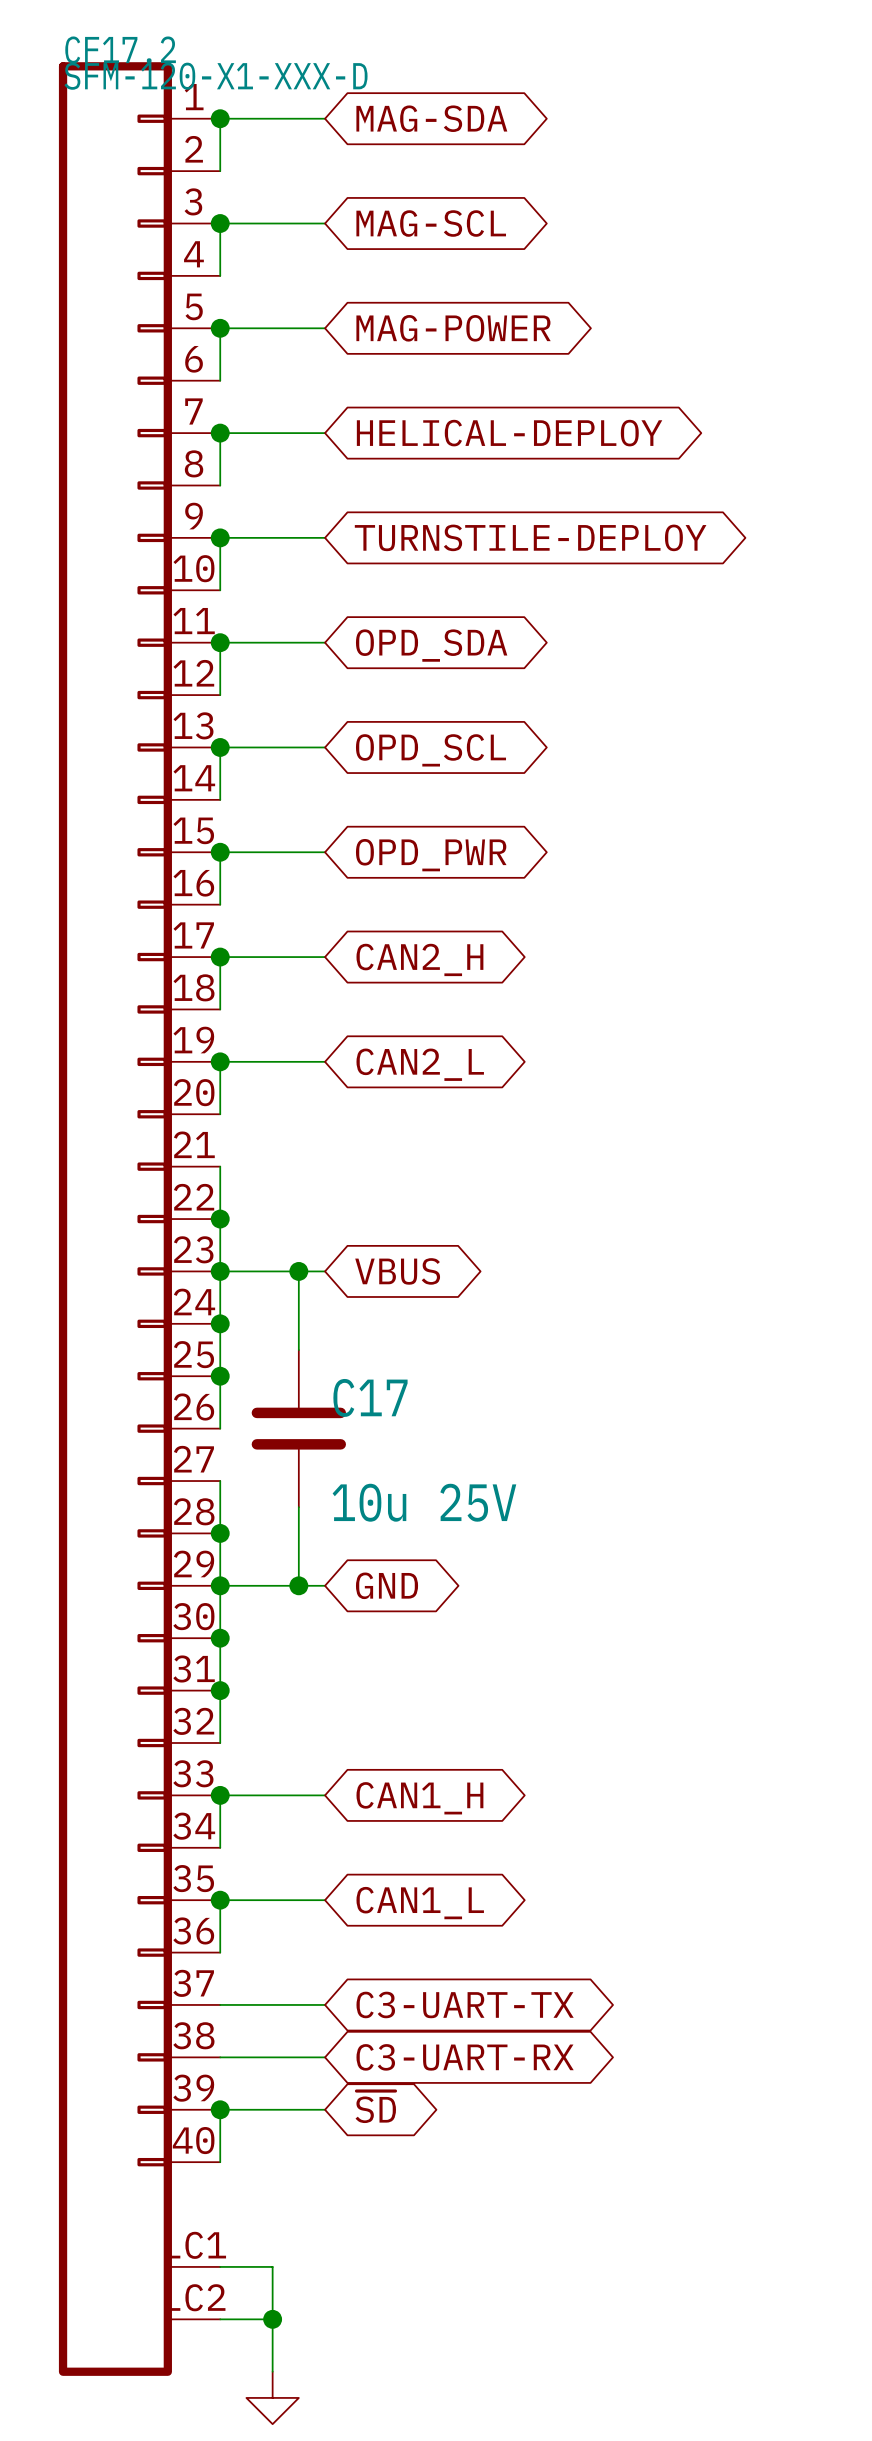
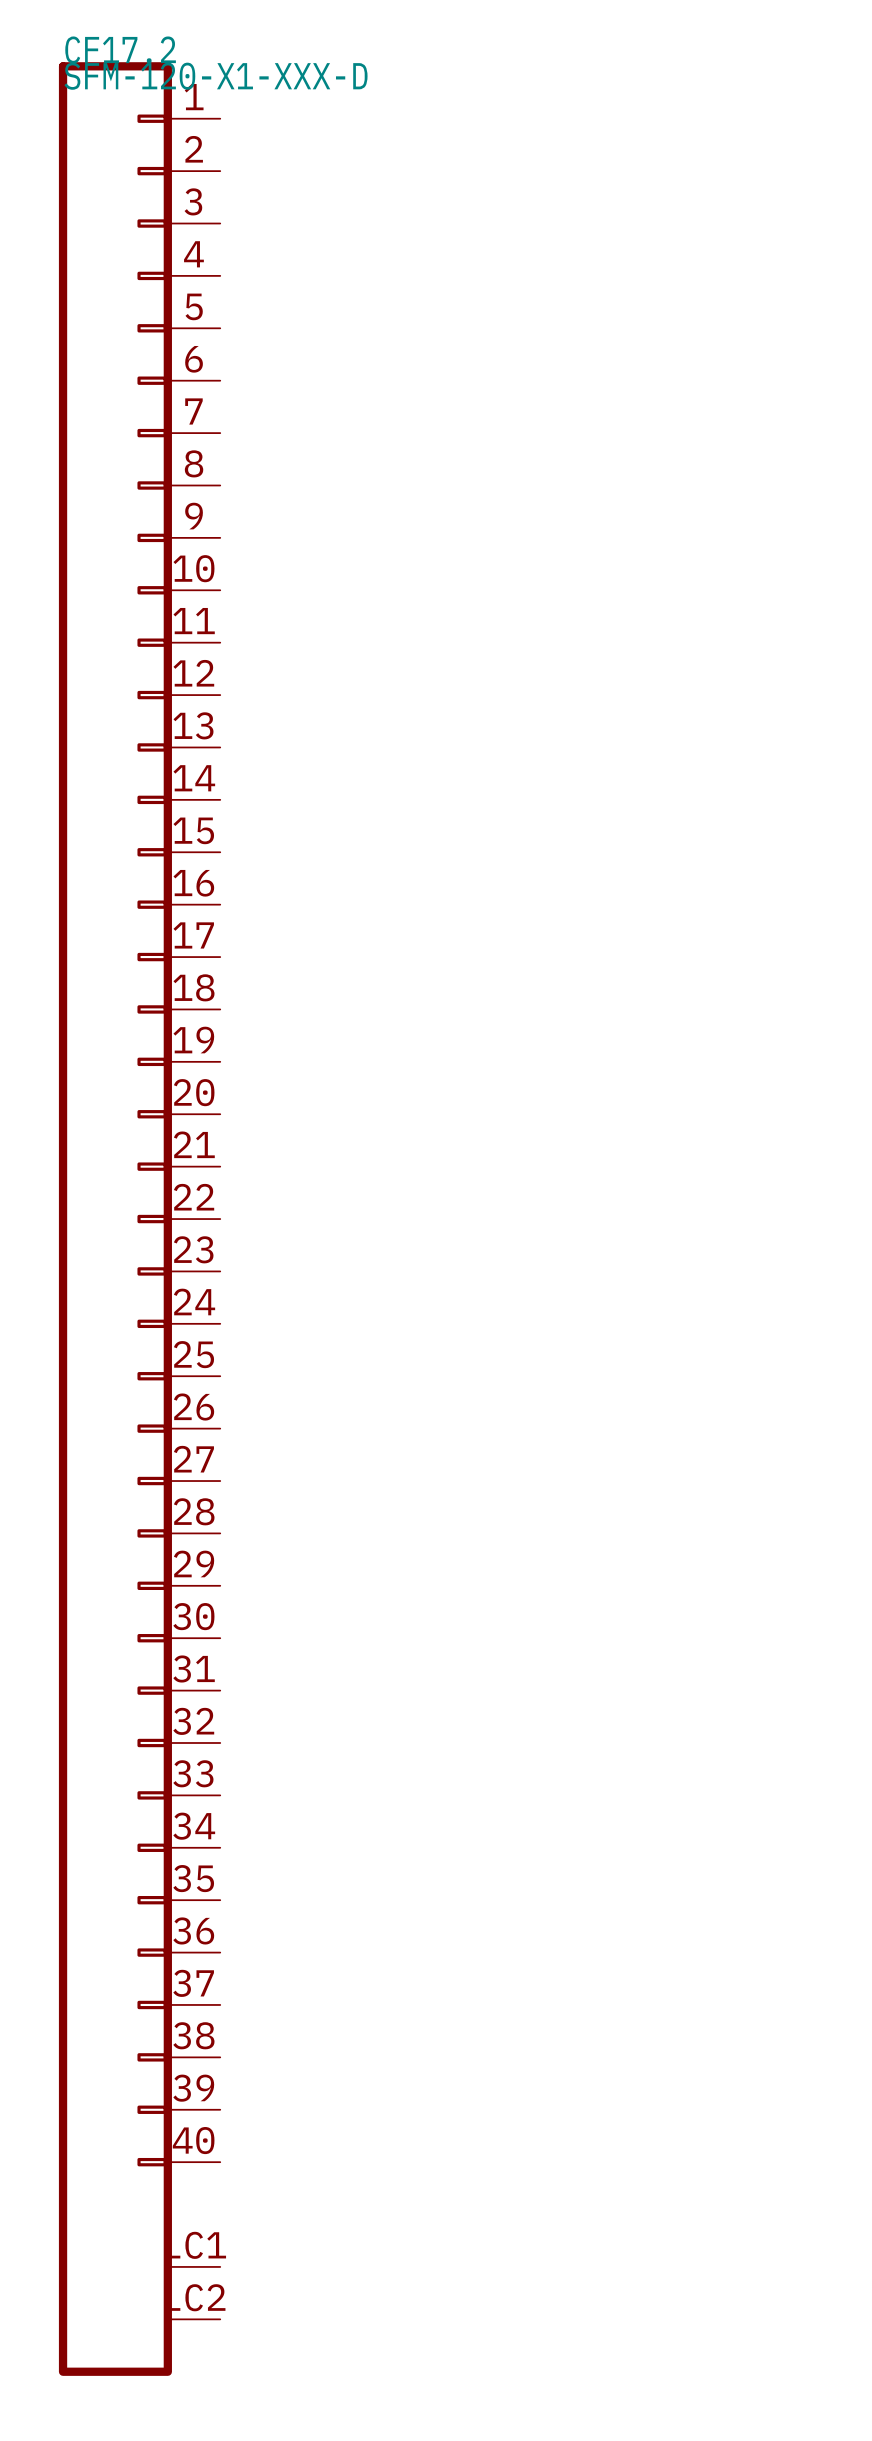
junction: (220, 118) -> none
wire: (325, 118) (220, 118) (220, 171) -> none
global label: MAG-SDA (431, 118) -> none
junction: (220, 223) -> none
wire: (325, 223) (220, 223) (220, 275) -> none
global label: MAG-SCL (431, 223) -> none
junction: (220, 328) -> none
wire: (325, 328) (220, 328) (220, 380) -> none
global label: MAG-POWER (453, 328) -> none
junction: (220, 433) -> none
wire: (325, 433) (220, 433) (220, 485) -> none
global label: HELICAL-DEPLOY (509, 433) -> none
junction: (220, 537) -> none
wire: (325, 537) (220, 537) (220, 590) -> none
global label: TURNSTILE-DEPLOY (530, 537) -> none
junction: (220, 642) -> none
wire: (325, 642) (220, 642) (220, 695) -> none
global label: OPD_SDA (431, 645) -> none
junction: (220, 747) -> none
wire: (325, 747) (220, 747) (220, 799) -> none
global label: OPD_SCL (430, 750) -> none
junction: (220, 852) -> none
wire: (325, 852) (220, 852) (220, 904) -> none
global label: OPD_PWR (431, 855) -> none
junction: (220, 957) -> none
wire: (325, 957) (220, 957) (220, 1009) -> none
global label: CAN2_H (419, 959) -> none
junction: (220, 1061) -> none
wire: (325, 1061) (220, 1061) (220, 1114) -> none
global label: CAN2_L (420, 1064) -> none
wire: (220, 1166) (220, 1428) -> none
junction: (220, 1219) -> none
wire: (220, 1271) (325, 1271) -> none
junction: (220, 1271) -> none
wire: (298, 1271) (298, 1350) -> none
junction: (298, 1271) -> none
global label: VBUS (397, 1271) -> none
junction: (220, 1323) -> none
junction: (220, 1376) -> none
C17: 10u 25V (298, 1428) -> none
wire: (220, 1481) (220, 1742) -> none
wire: (298, 1507) (298, 1585) -> none
junction: (220, 1533) -> none
wire: (220, 1585) (325, 1585) -> none
junction: (220, 1585) -> none
junction: (298, 1585) -> none
global label: GND (387, 1585) -> none
junction: (220, 1638) -> none
junction: (220, 1690) -> none
junction: (220, 1795) -> none
wire: (325, 1795) (220, 1795) (220, 1847) -> none
global label: CAN1_H (419, 1798) -> none
junction: (220, 1900) -> none
wire: (325, 1900) (220, 1900) (220, 1952) -> none
global label: CAN1_L (420, 1903) -> none
wire: (220, 2004) (325, 2004) -> none
global label: C3-UART-TX (465, 2004) -> none
wire: (220, 2057) (325, 2057) -> none
global label: C3-UART-RX (465, 2057) -> none
global label: ~{SD} (375, 2107) -> none
junction: (220, 2109) -> none
wire: (325, 2109) (220, 2109) (220, 2162) -> none
wire: (220, 2266) (272, 2266) (272, 2371) -> none
wire: (220, 2319) (272, 2319) -> none
junction: (272, 2319) -> none
power symbol: (272, 2397) -> none

